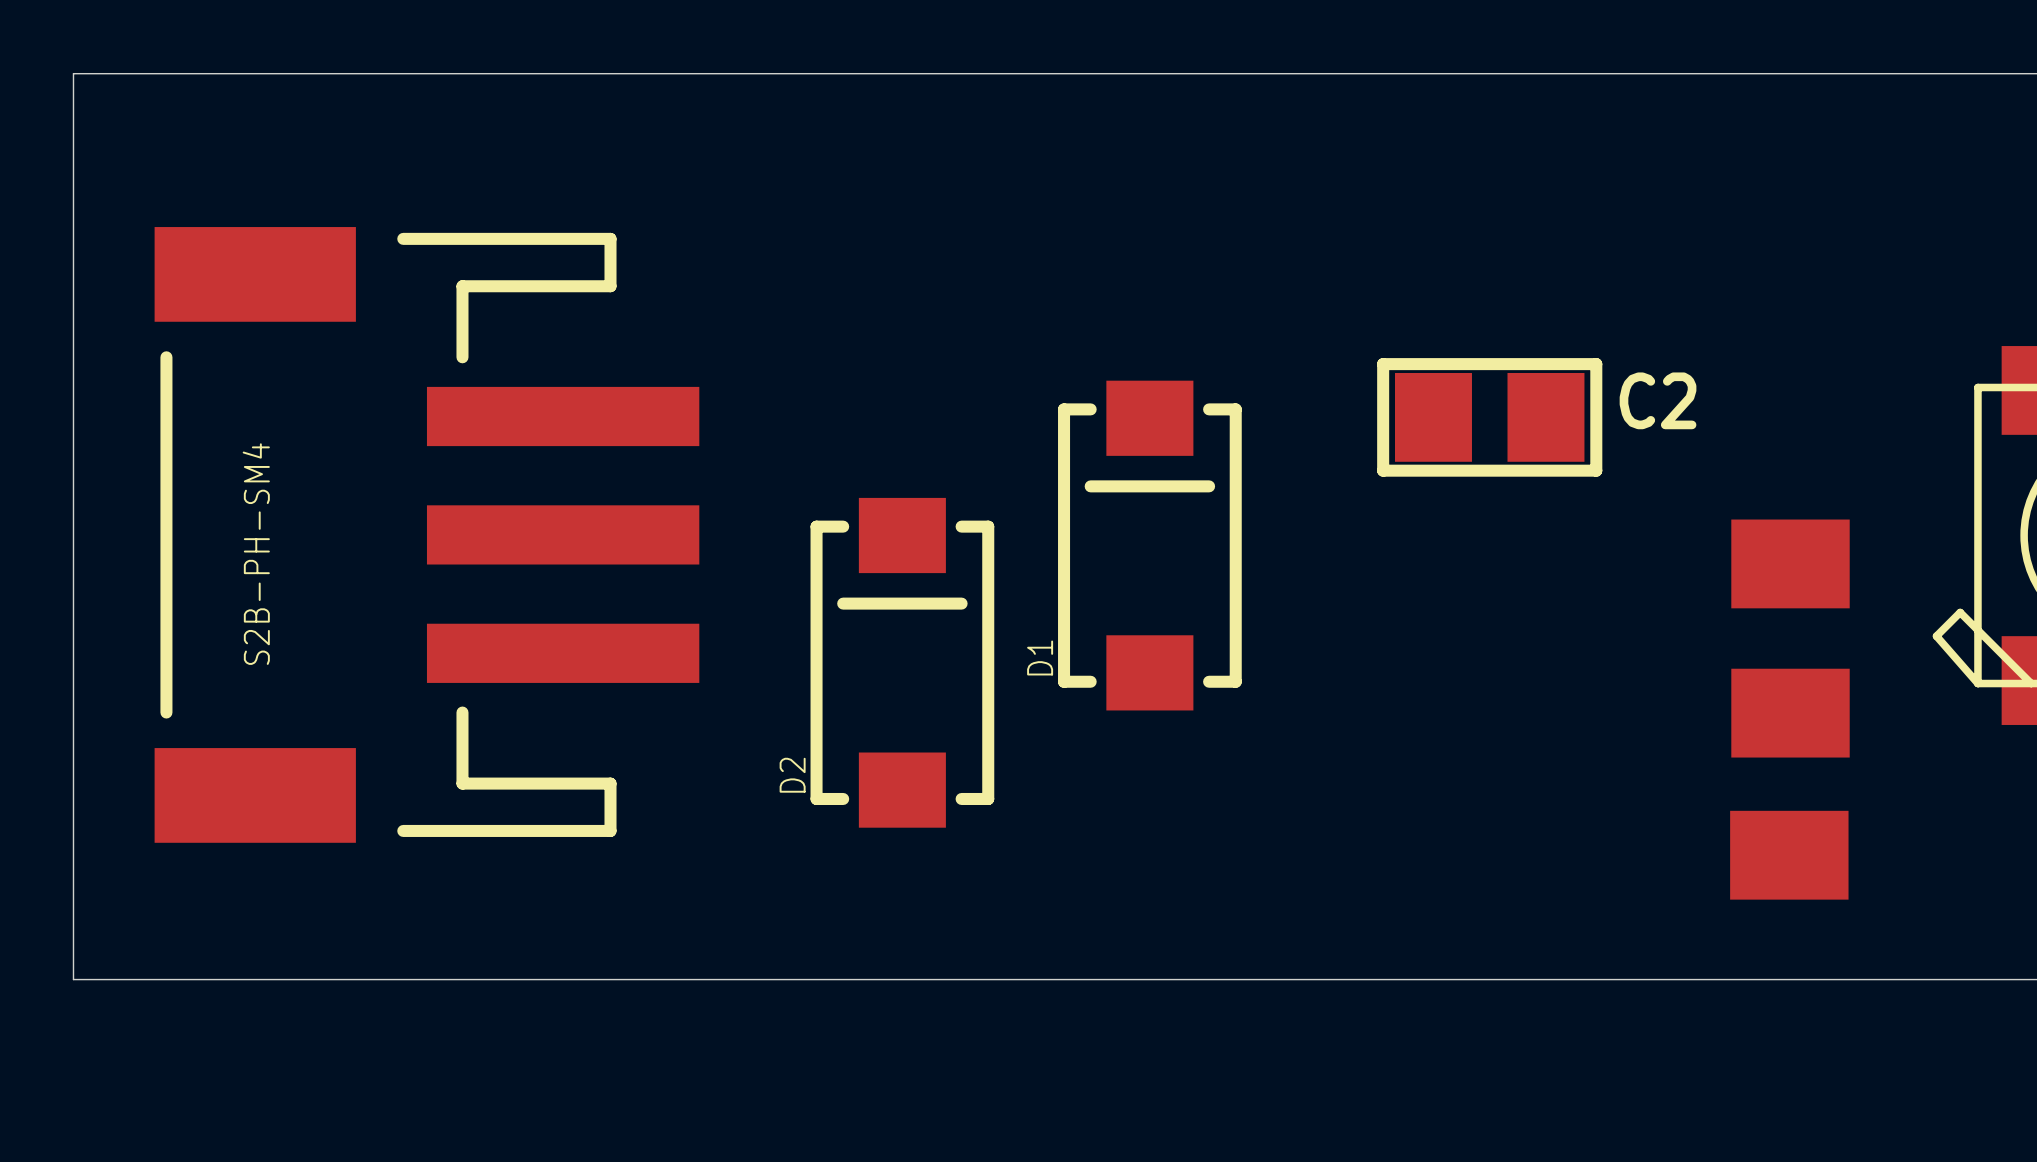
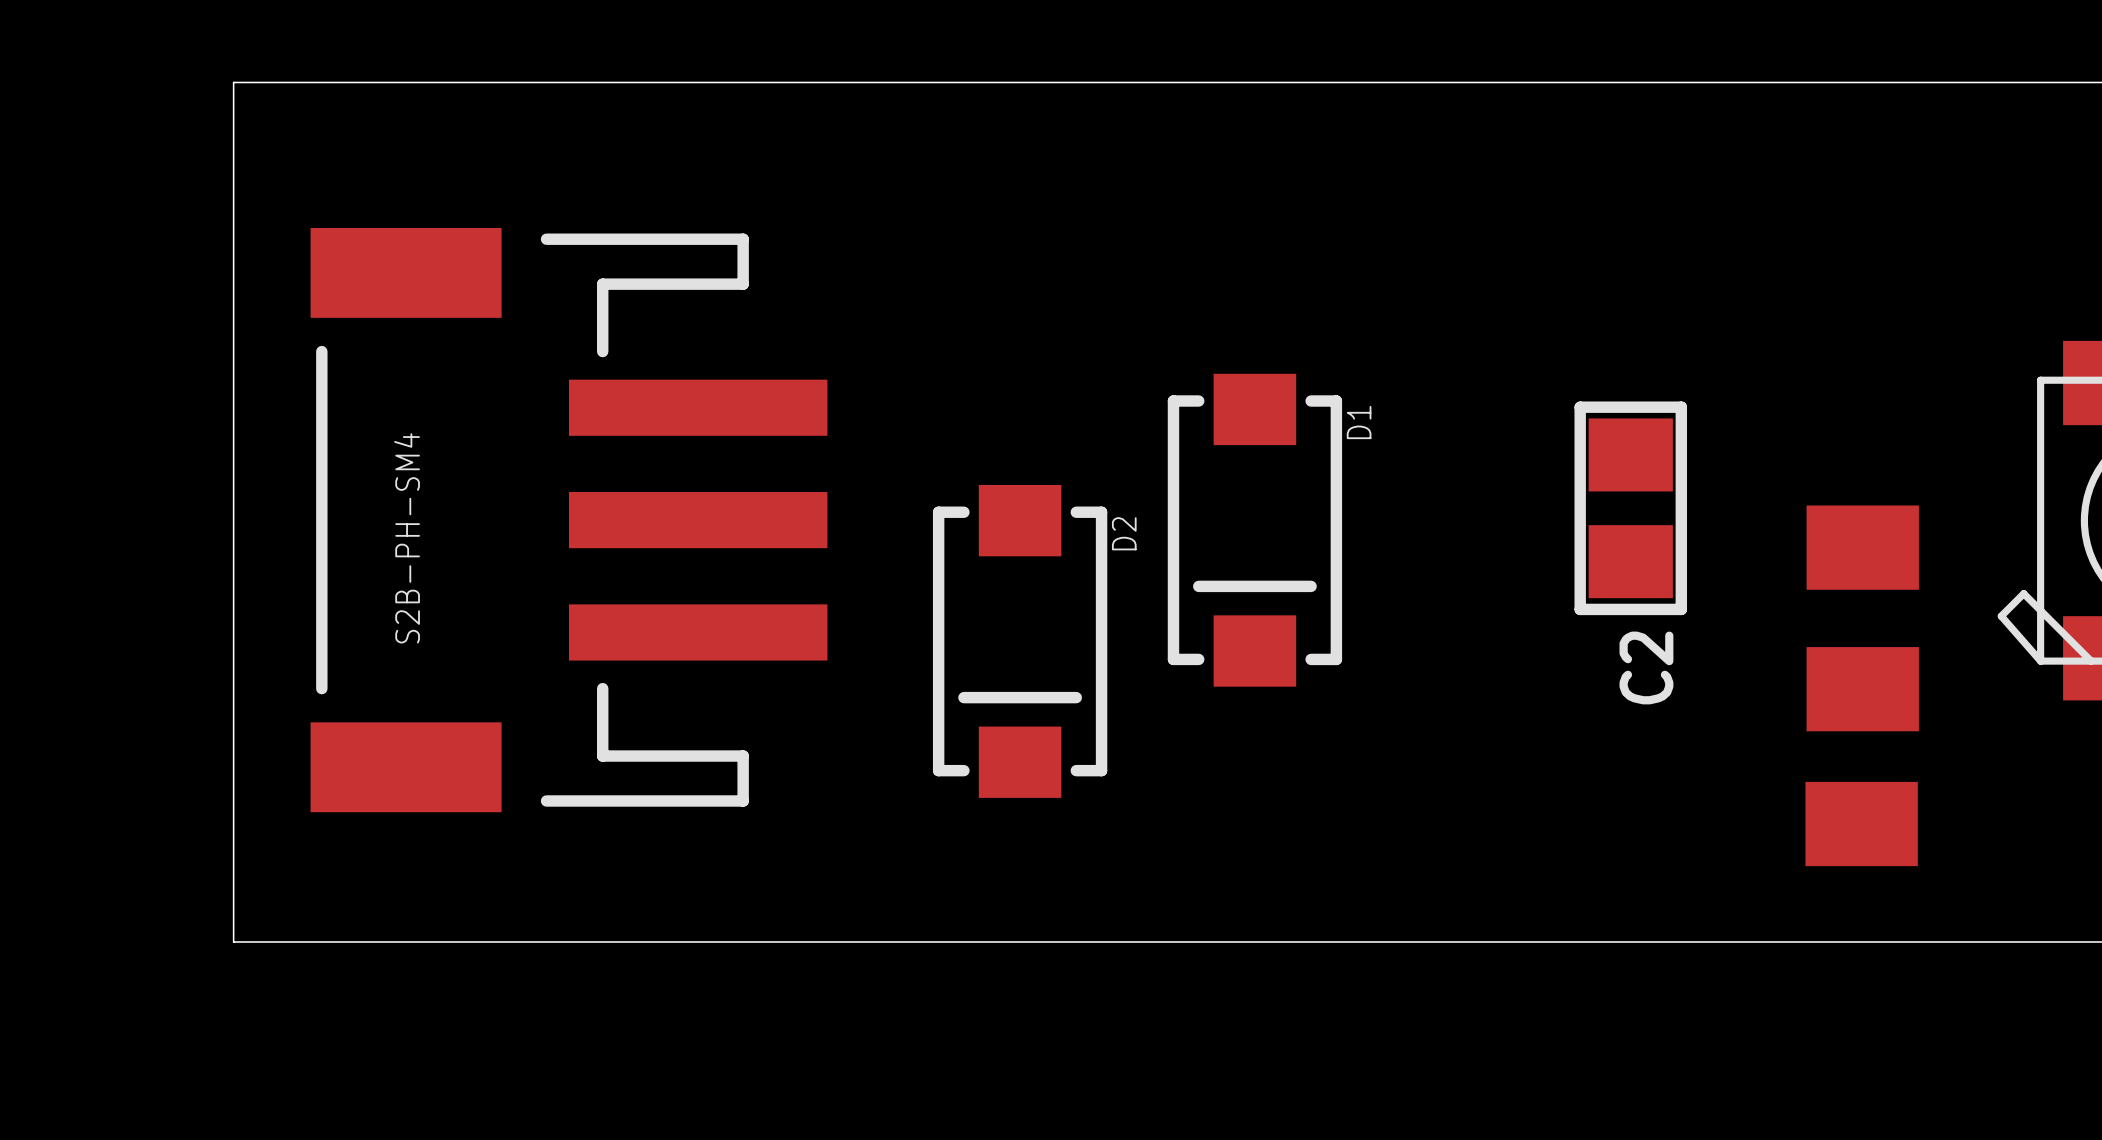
C2 rotation: 0° (1489, 417) -> 90° clockwise (1630, 508)
D1 rotation: 0° (1149, 545) -> 180° (1254, 530)
D2 rotation: 0° (902, 662) -> 180° (1020, 641)

